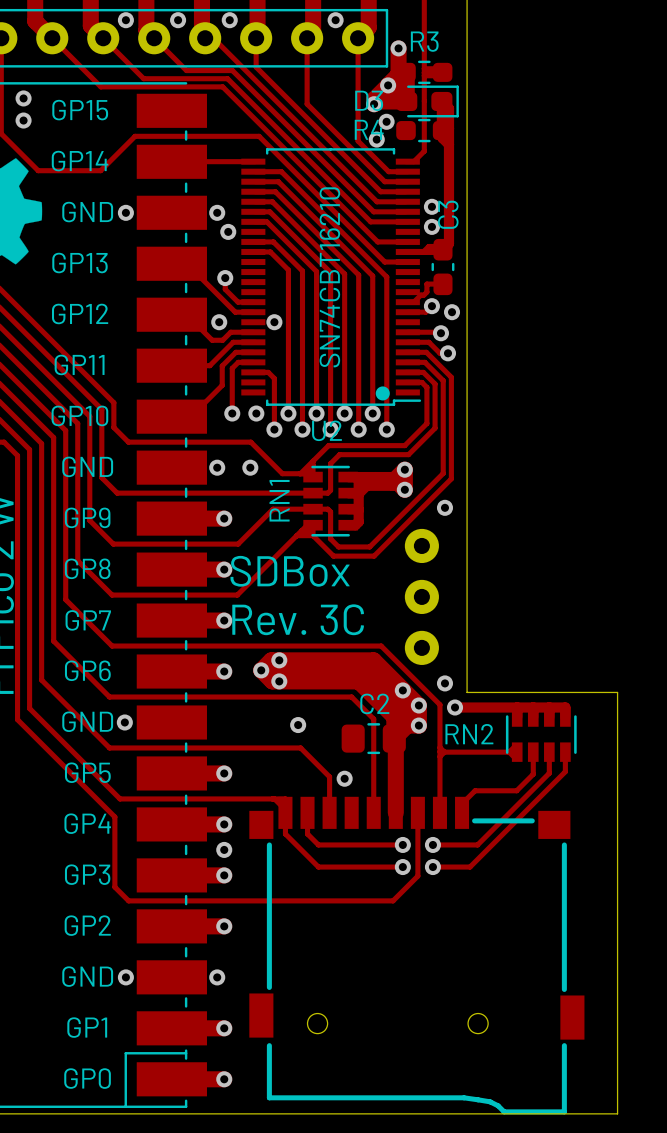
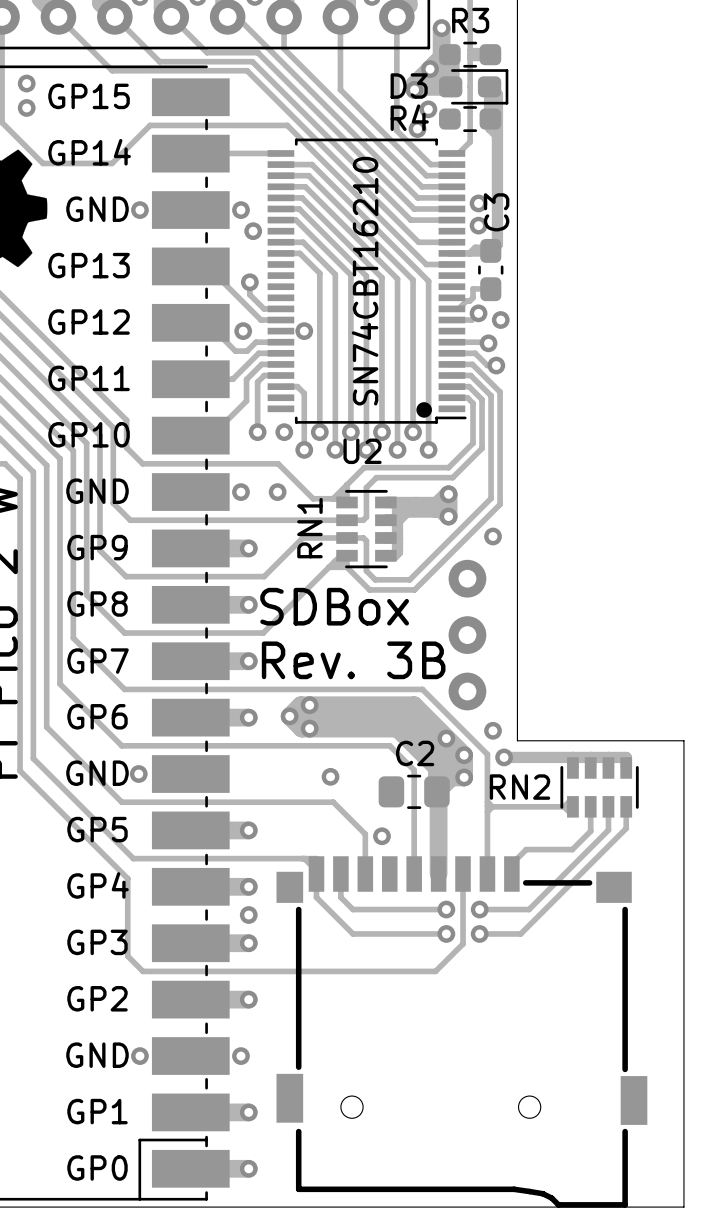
text: Rev. 3C (298, 619) -> Rev. 3B (353, 660)

